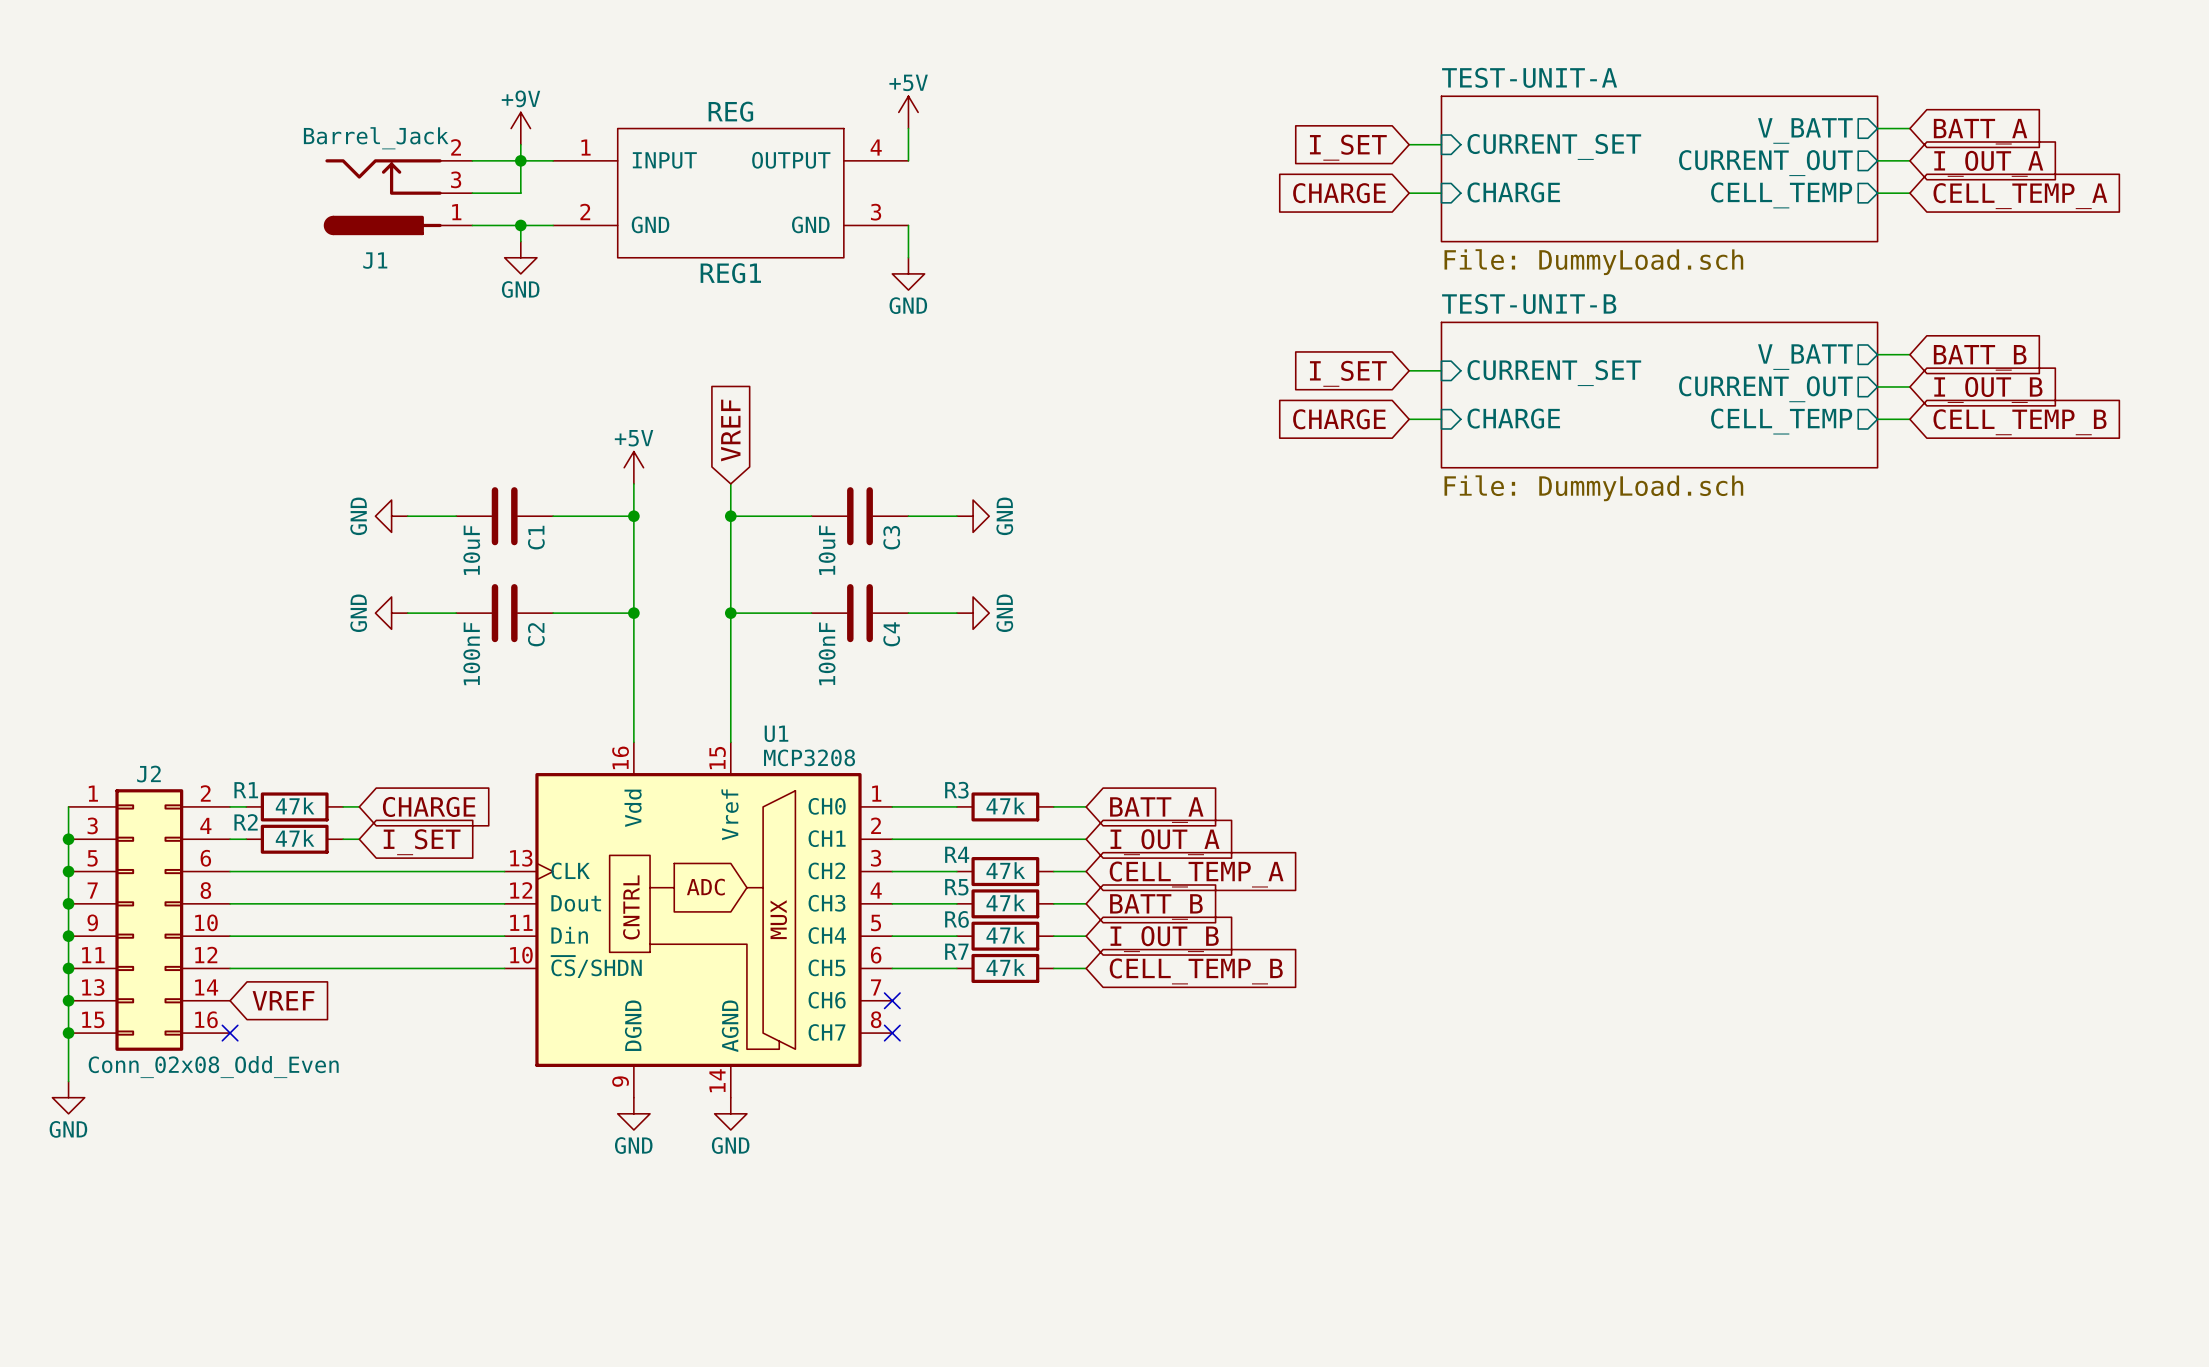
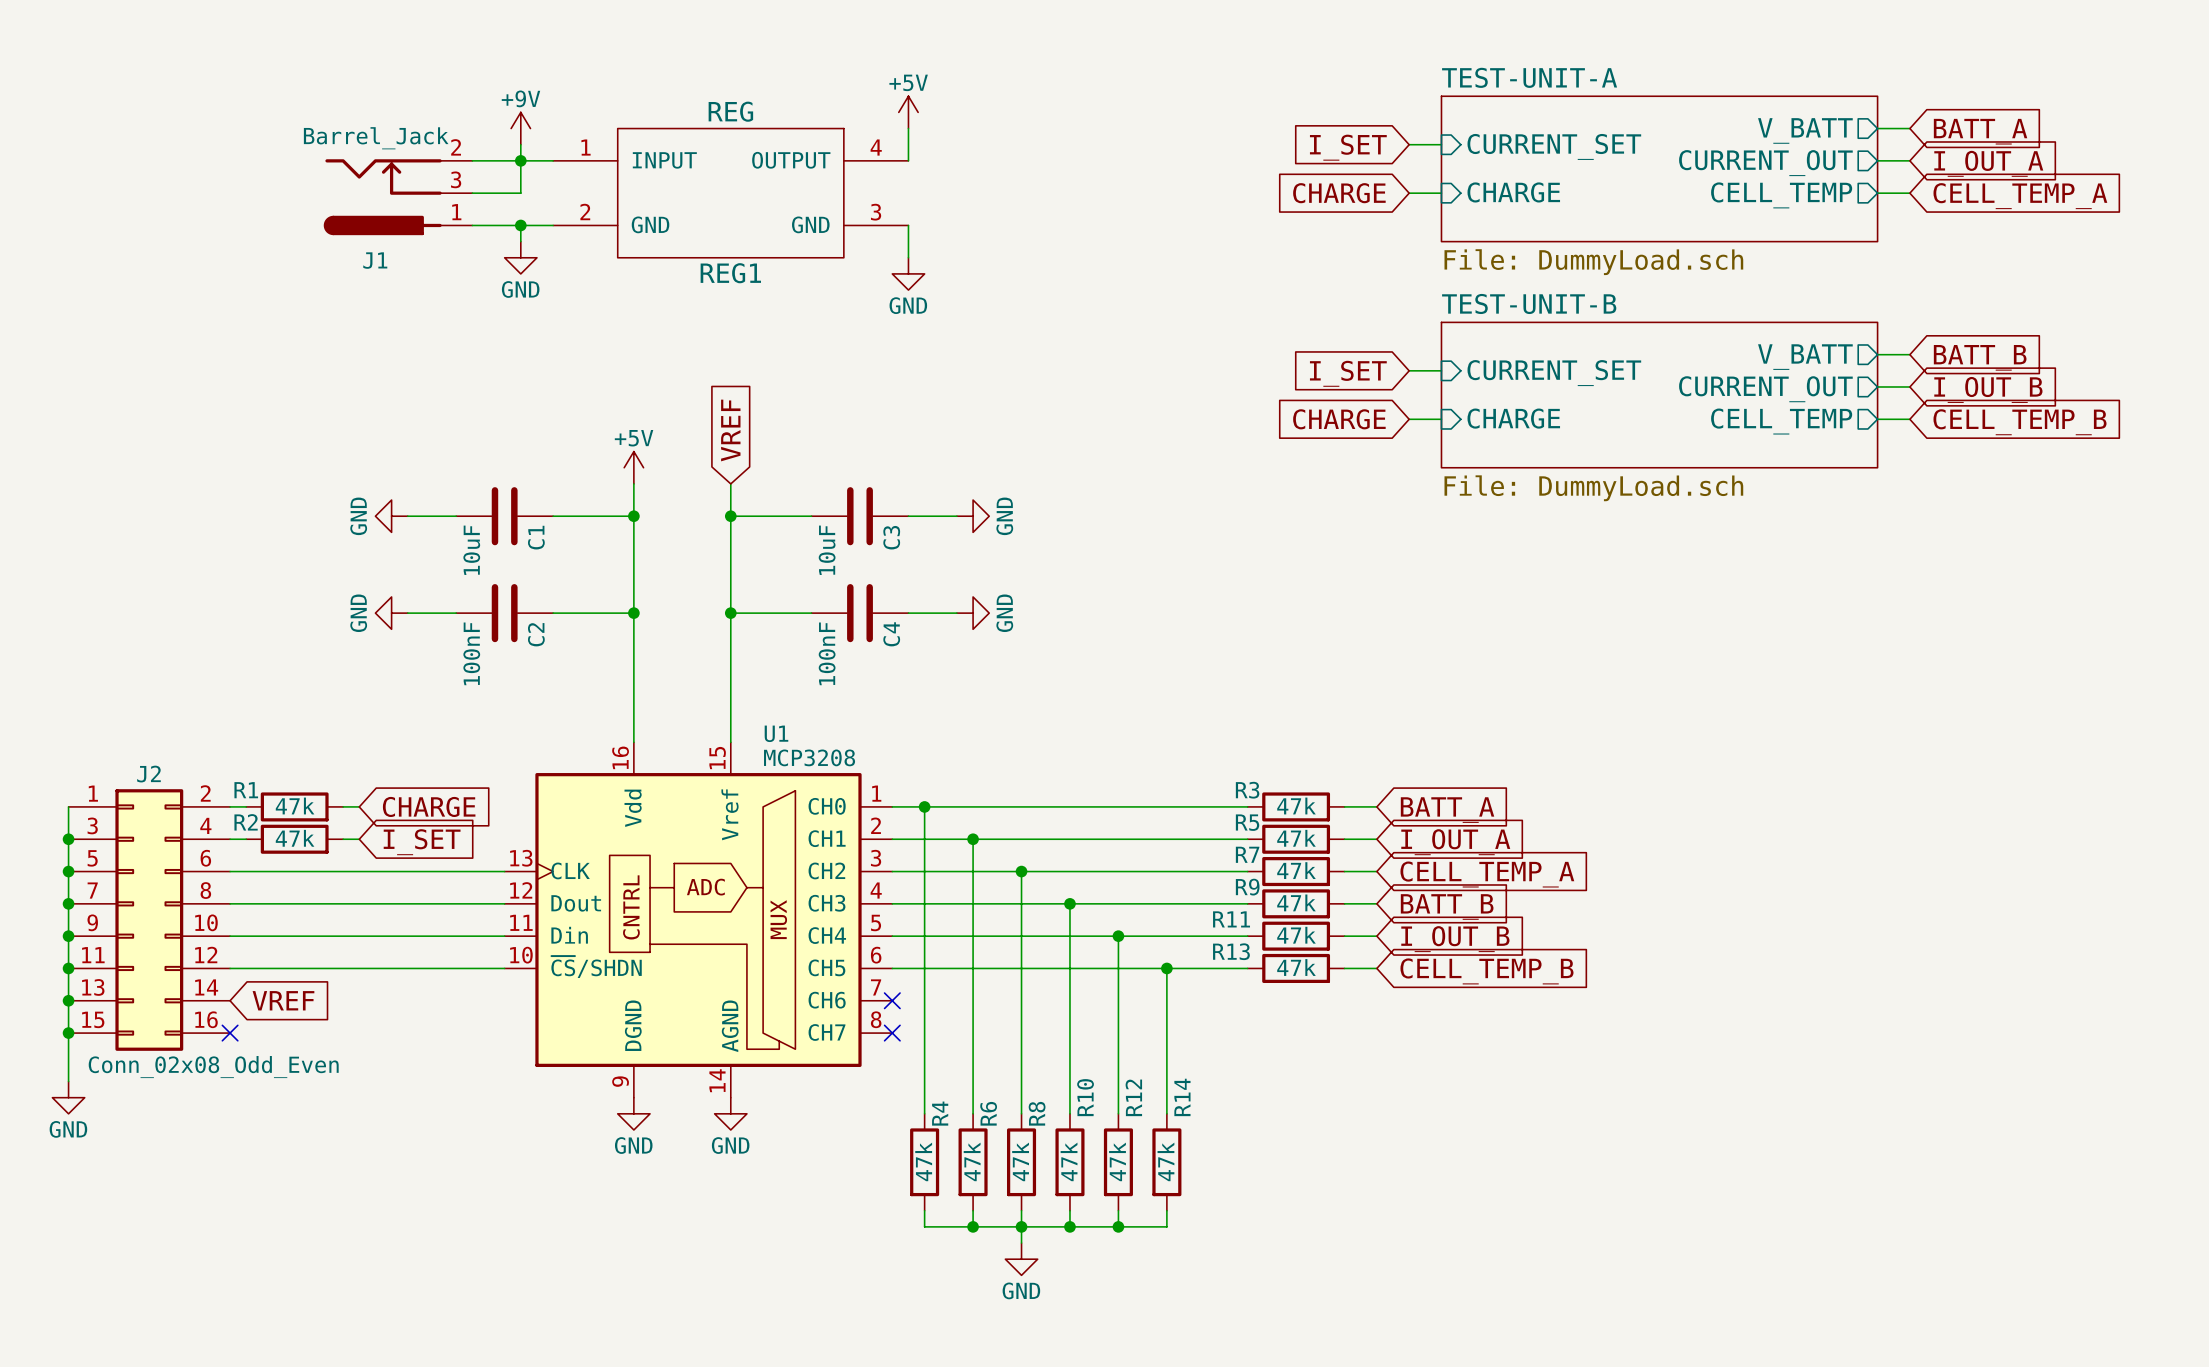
wire: none -> (924, 806) (924, 1113)
junction: none -> (924, 806)
wire: none -> (956, 806) (1053, 806)
R3 position: (1005, 806) -> (1296, 806)
wire: none -> (1086, 806) (1247, 806)
wire: none -> (1344, 806) (1376, 806)
global label position: BATT_A (1156, 810) -> BATT_A (1447, 810)
wire: none -> (973, 839) (973, 1113)
junction: none -> (973, 839)
wire: none -> (1086, 839) (1247, 839)
wire: none -> (1344, 839) (1376, 839)
global label position: I_OUT_A (1165, 842) -> I_OUT_A (1455, 842)
wire: none -> (956, 871) (1053, 871)
R4 rotation: 0° (1005, 871) -> 90° clockwise (924, 1162)
R4 position: (1005, 871) -> (924, 1162)
wire: none -> (1021, 871) (1021, 1113)
junction: none -> (1021, 871)
wire: none -> (1086, 871) (1247, 871)
wire: none -> (1344, 871) (1376, 871)
global label position: CELL_TEMP_A (1196, 874) -> CELL_TEMP_A (1487, 874)
wire: none -> (956, 903) (1053, 903)
R5 position: (1005, 903) -> (1296, 839)
wire: none -> (1069, 903) (1069, 1113)
junction: none -> (1069, 903)
wire: none -> (1086, 903) (1247, 903)
R9: none -> 47k (1296, 903)
wire: none -> (1344, 903) (1376, 903)
global label position: BATT_B (1156, 906) -> BATT_B (1447, 906)
wire: none -> (956, 936) (1053, 936)
R6 rotation: 0° (1005, 936) -> 90° clockwise (973, 1162)
R6 position: (1005, 936) -> (973, 1162)
wire: none -> (1086, 936) (1247, 936)
wire: none -> (1118, 936) (1118, 1113)
junction: none -> (1118, 936)
R11: none -> 47k (1296, 936)
wire: none -> (1344, 936) (1376, 936)
global label position: I_OUT_B (1164, 939) -> I_OUT_B (1455, 939)
wire: none -> (956, 968) (1053, 968)
R7 position: (1005, 968) -> (1296, 871)
wire: none -> (1086, 968) (1247, 968)
wire: none -> (1166, 968) (1166, 1113)
junction: none -> (1166, 968)
R13: none -> 47k (1296, 968)
wire: none -> (1344, 968) (1376, 968)
global label position: CELL_TEMP_B (1196, 971) -> CELL_TEMP_B (1486, 971)
R8: none -> 47k (1021, 1162)
R10: none -> 47k (1069, 1162)
R12: none -> 47k (1118, 1162)
R14: none -> 47k (1166, 1162)
wire: none -> (924, 1210) (924, 1226) (1166, 1226) (1166, 1210)
wire: none -> (973, 1210) (973, 1226)
wire: none -> (1021, 1210) (1021, 1243)
wire: none -> (1069, 1210) (1069, 1226)
wire: none -> (1118, 1210) (1118, 1226)
junction: none -> (973, 1226)
junction: none -> (1021, 1226)
junction: none -> (1069, 1226)
junction: none -> (1118, 1226)
power symbol: none -> GND (1021, 1259)

